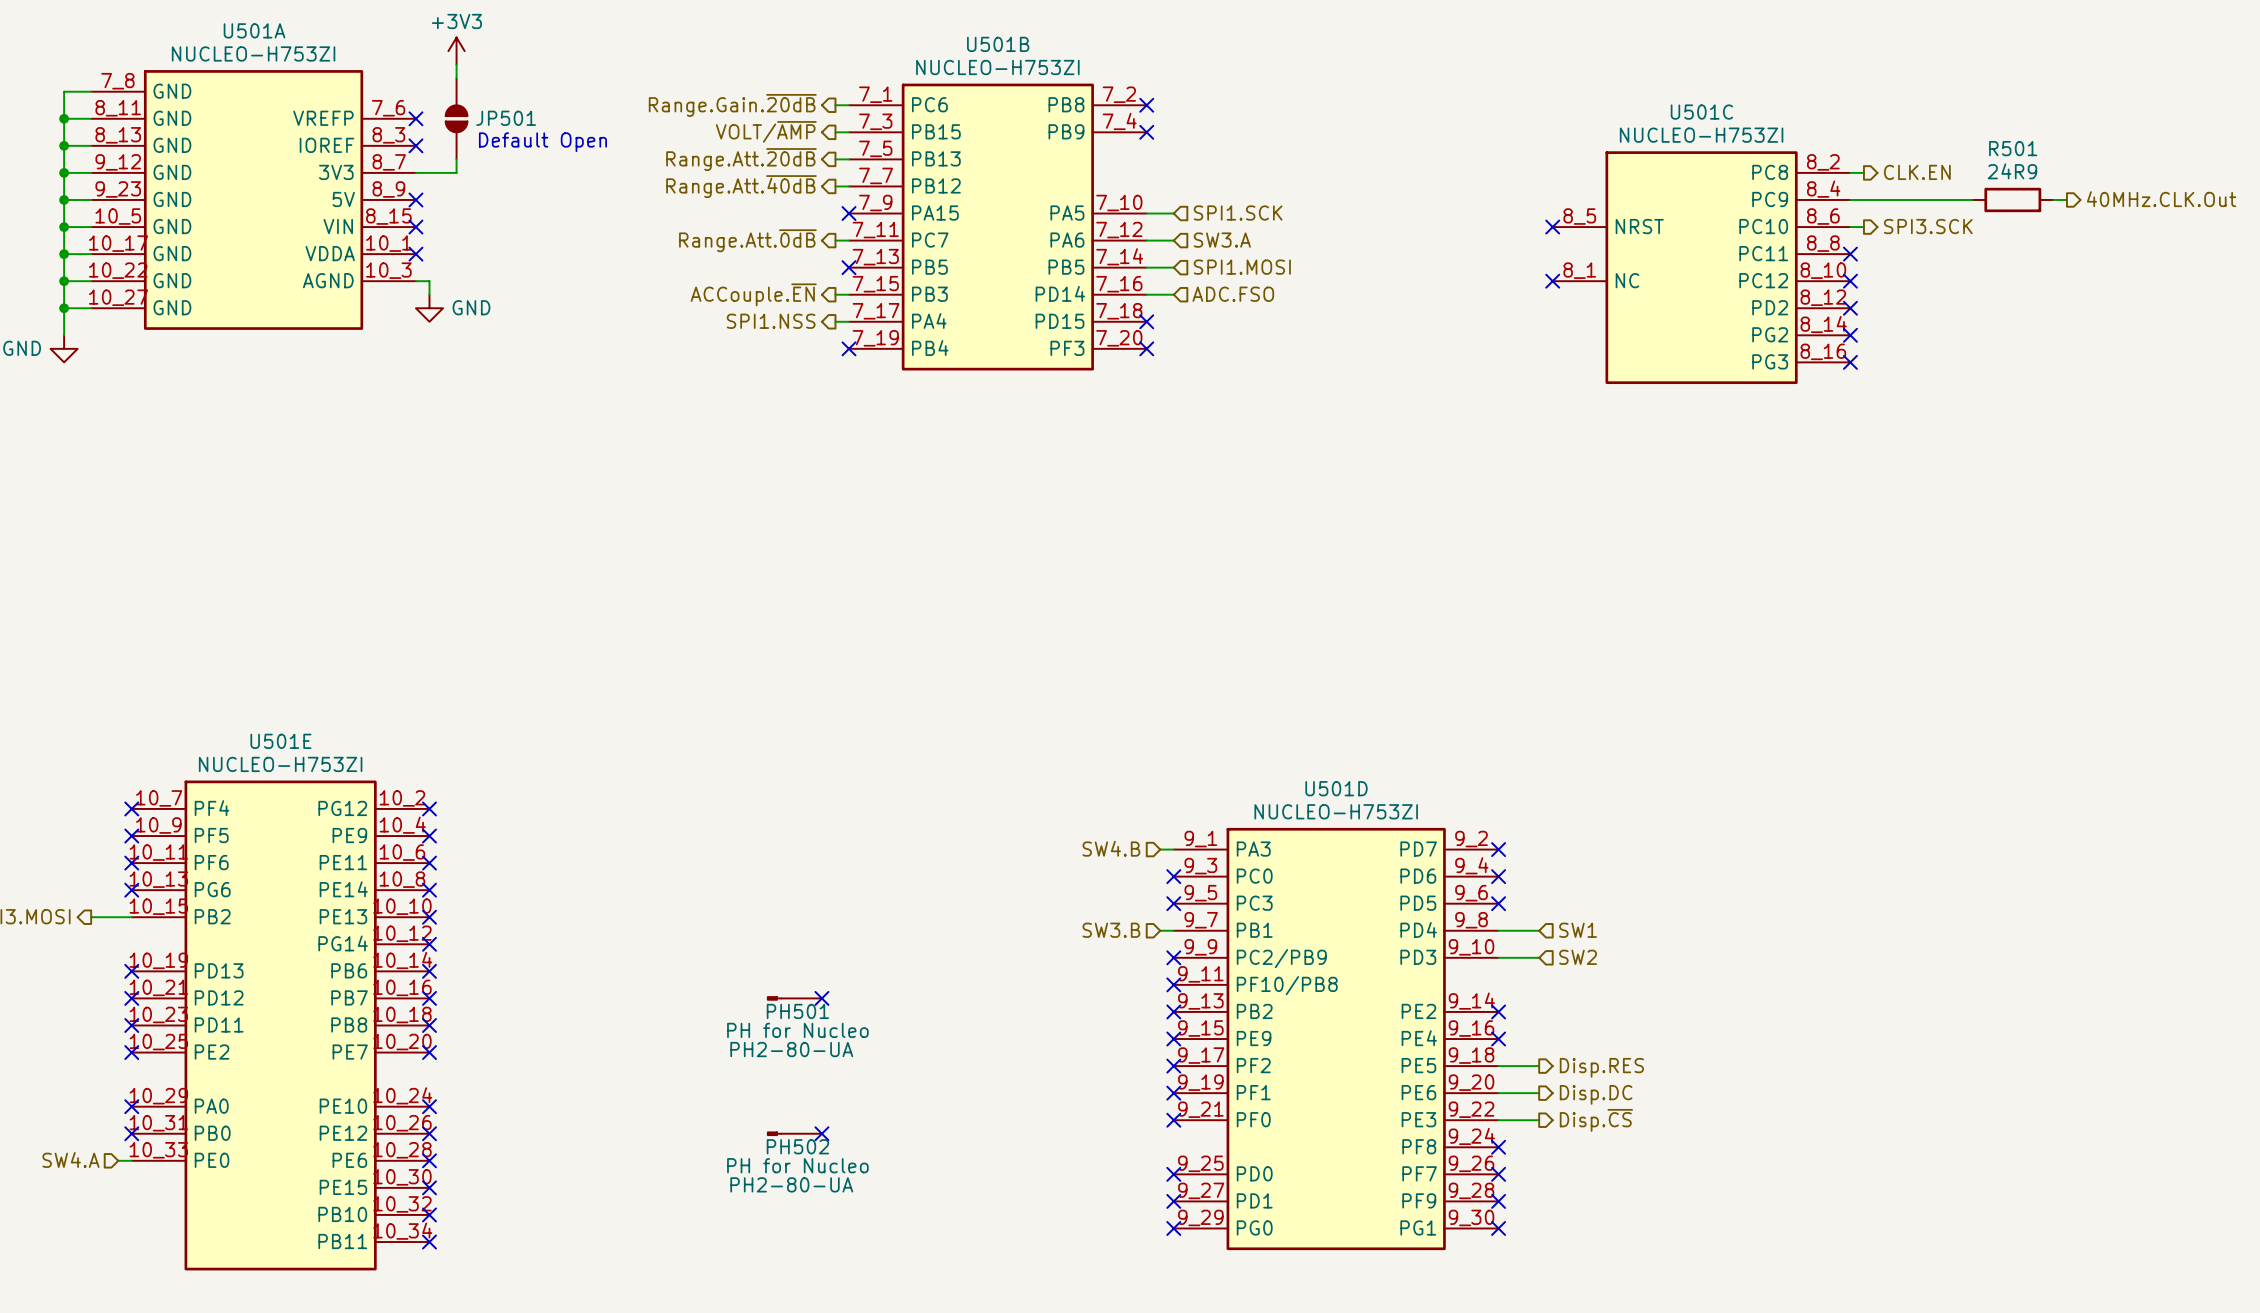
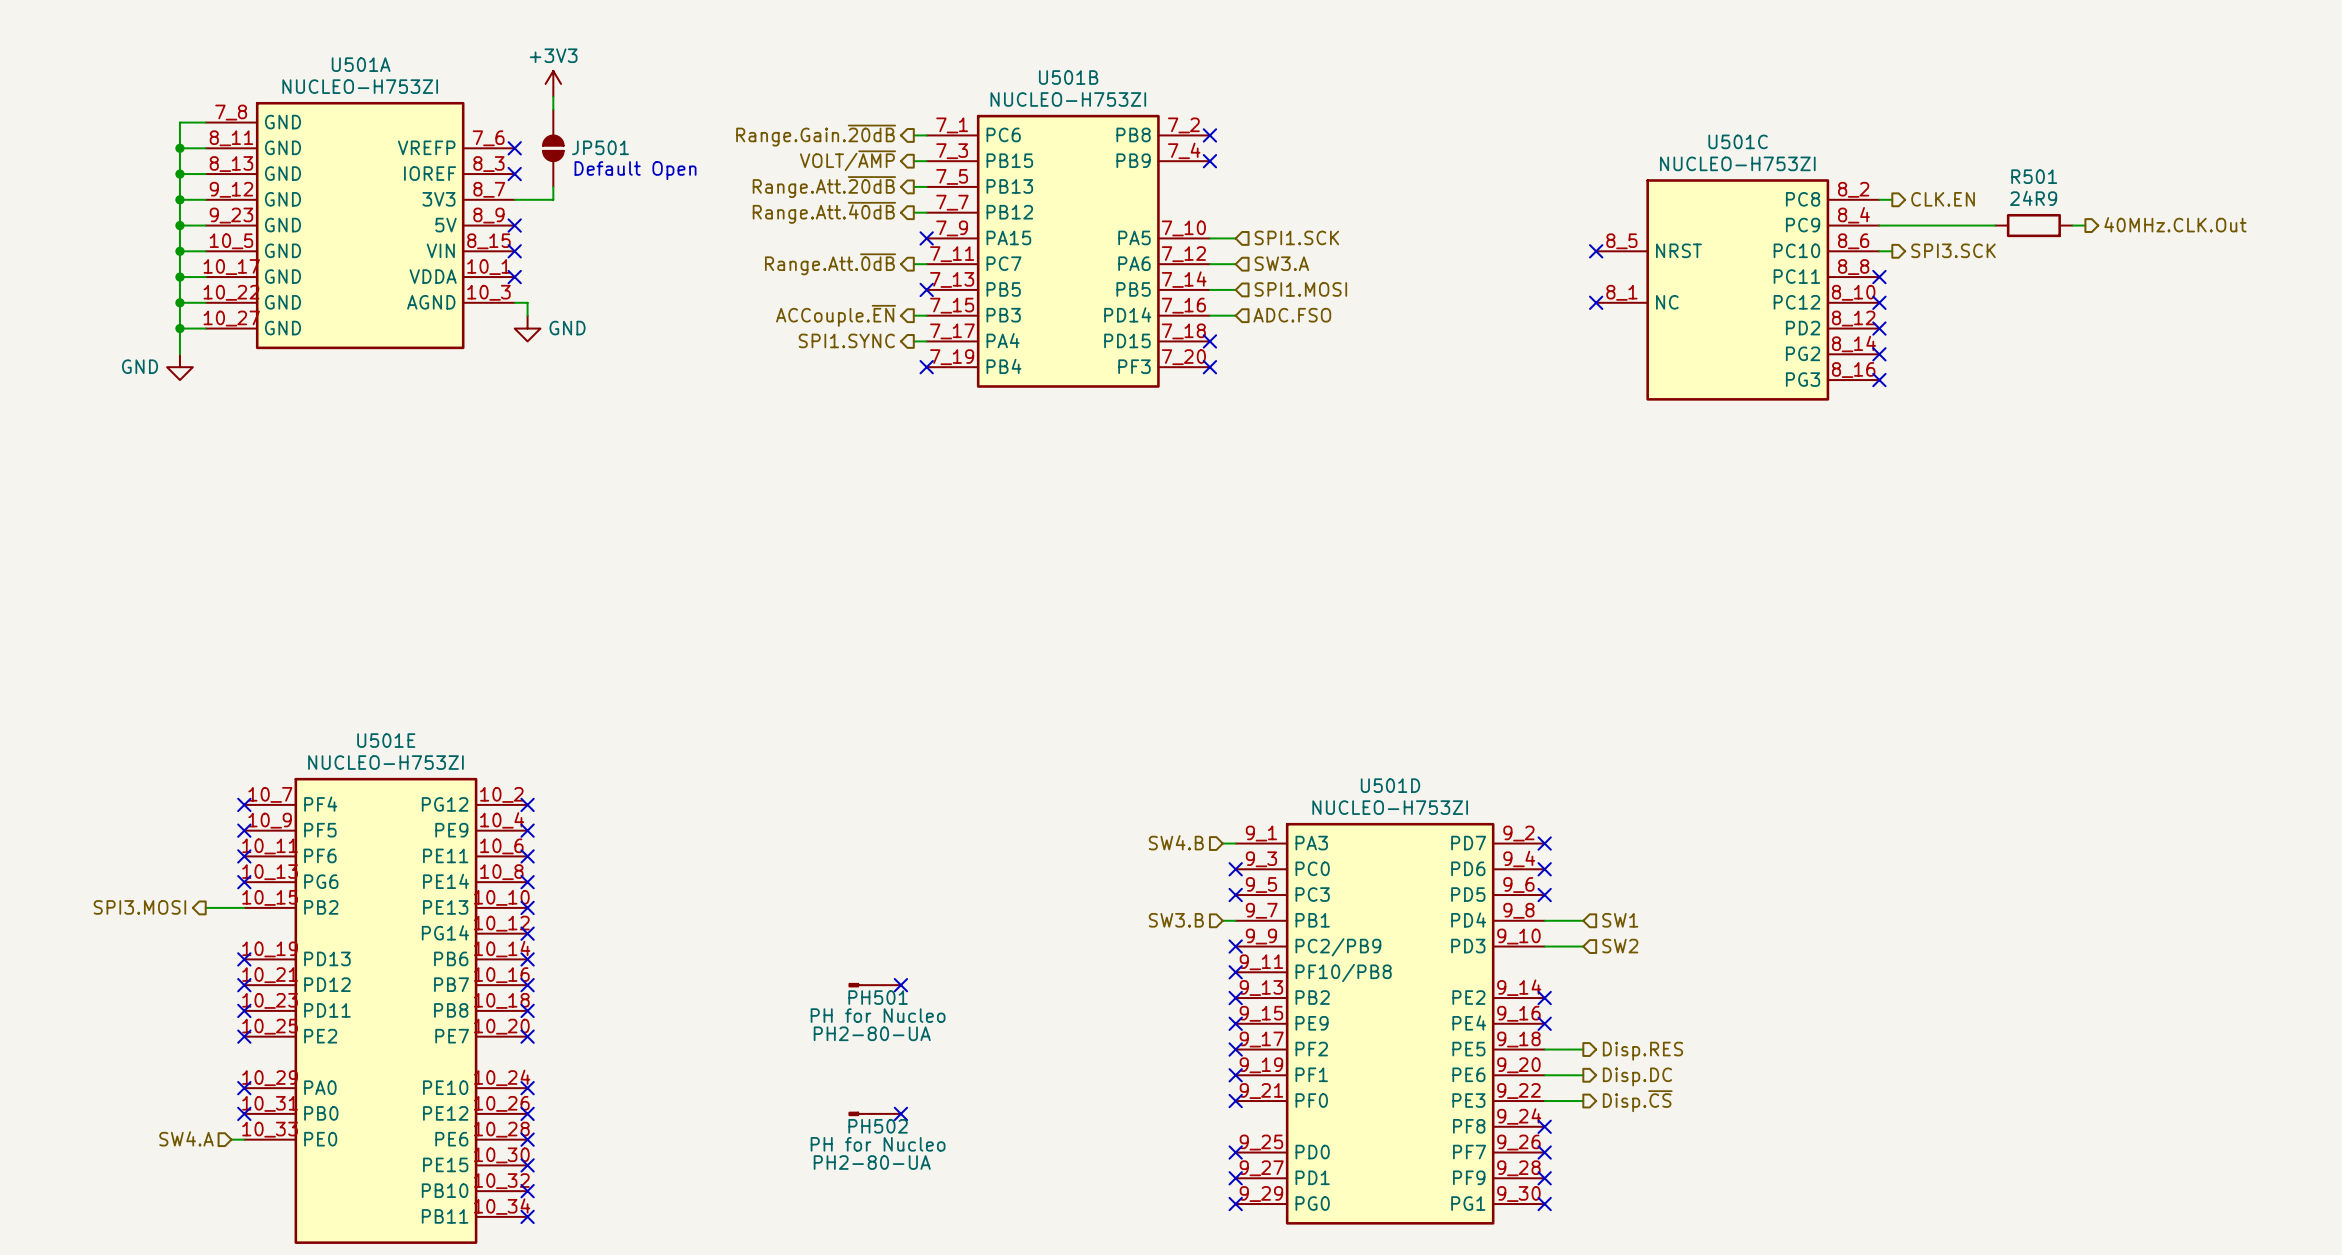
hierarchical label: SPI1.NSS (771, 321) -> SPI1.SYNC (846, 340)

